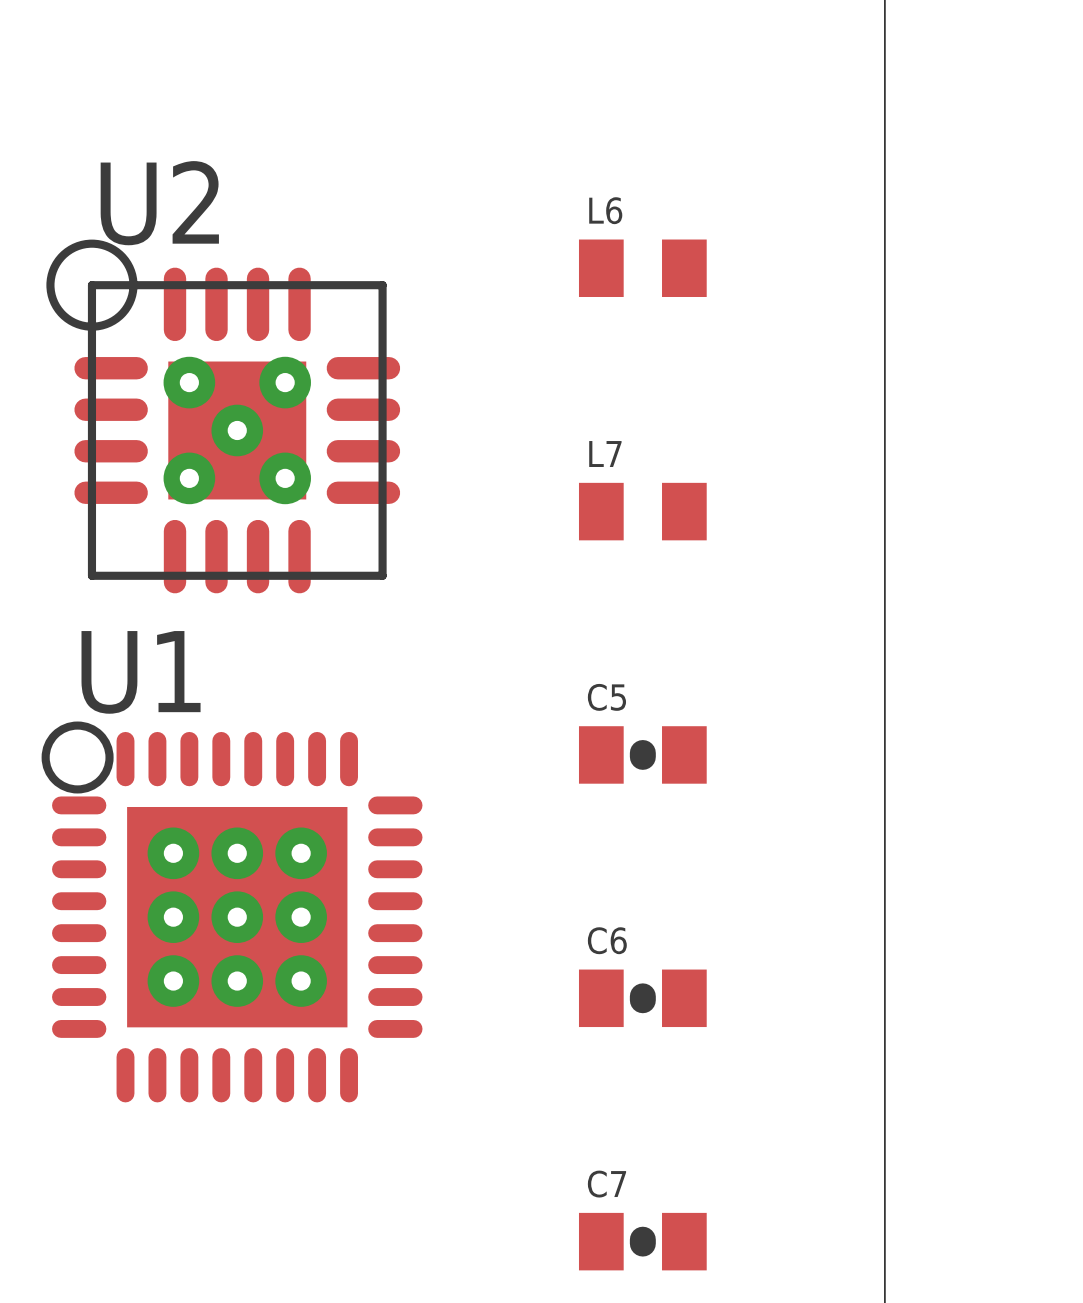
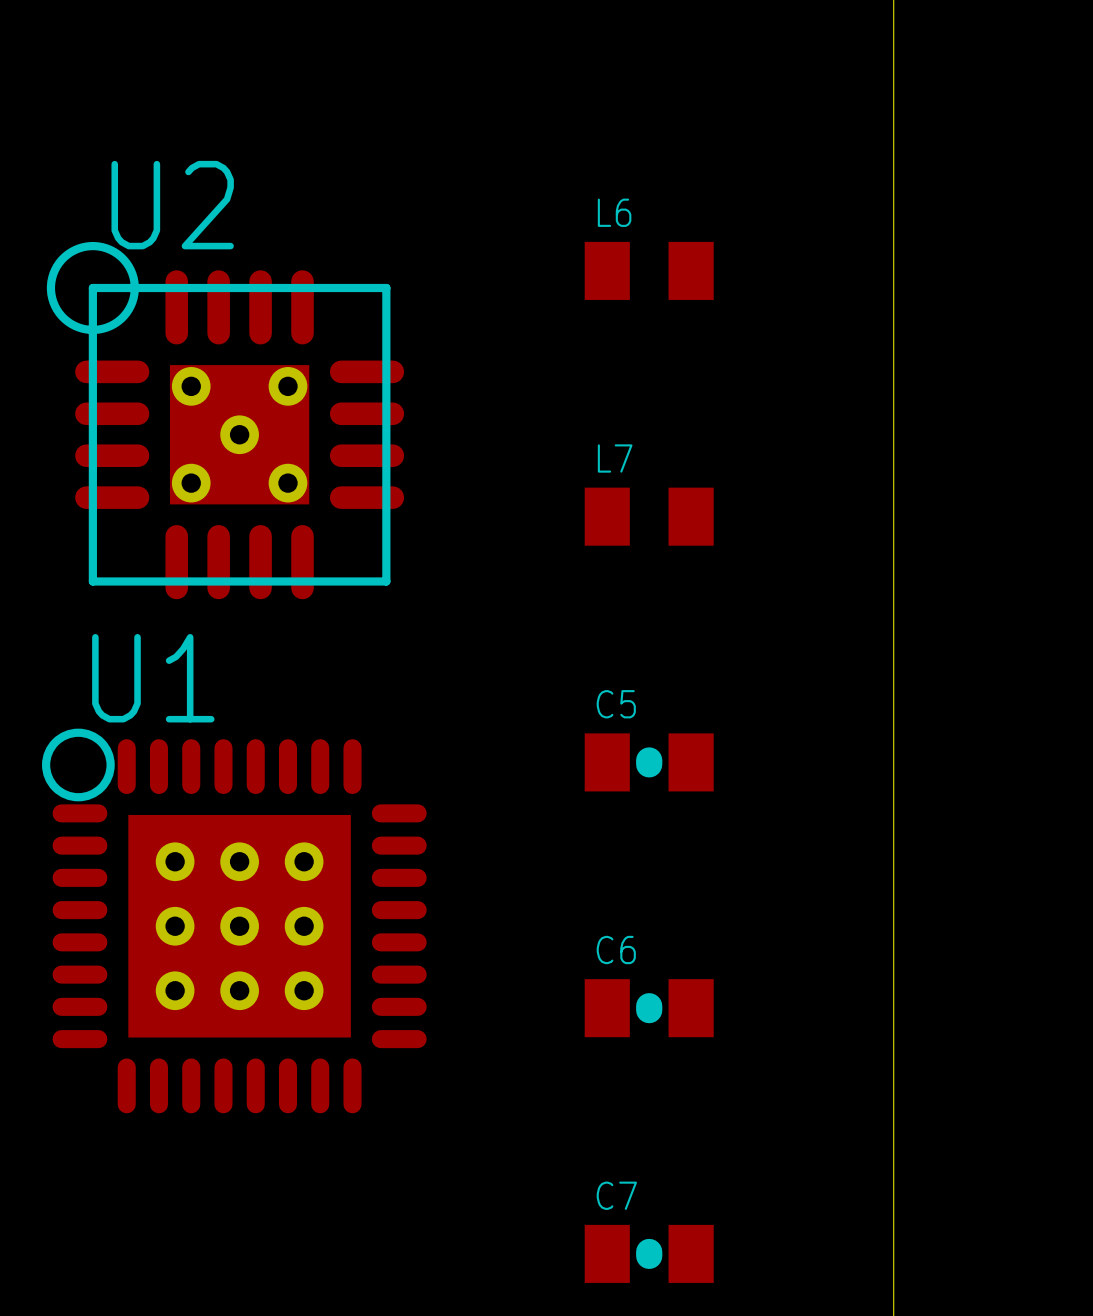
U2 footprint: [46, 239, 401, 594] -> [46, 241, 405, 600]
U1 footprint: [41, 721, 423, 1103] -> [42, 728, 427, 1114]

